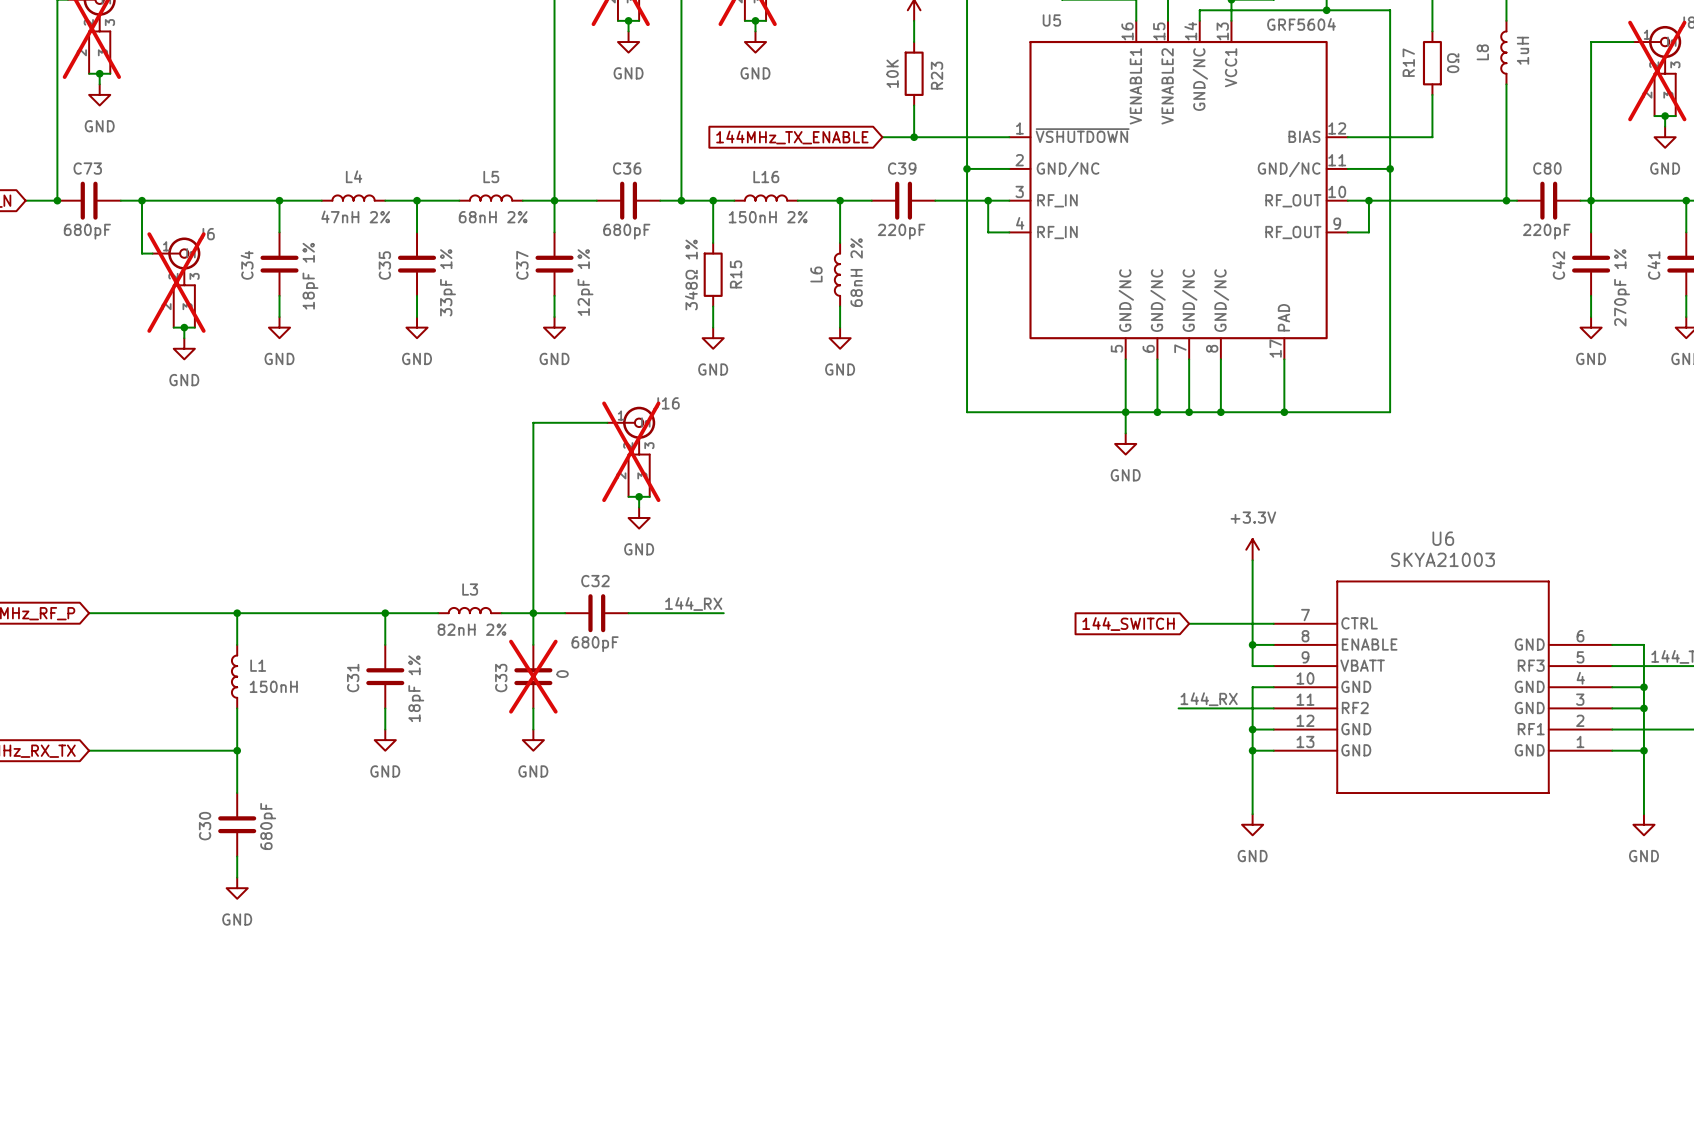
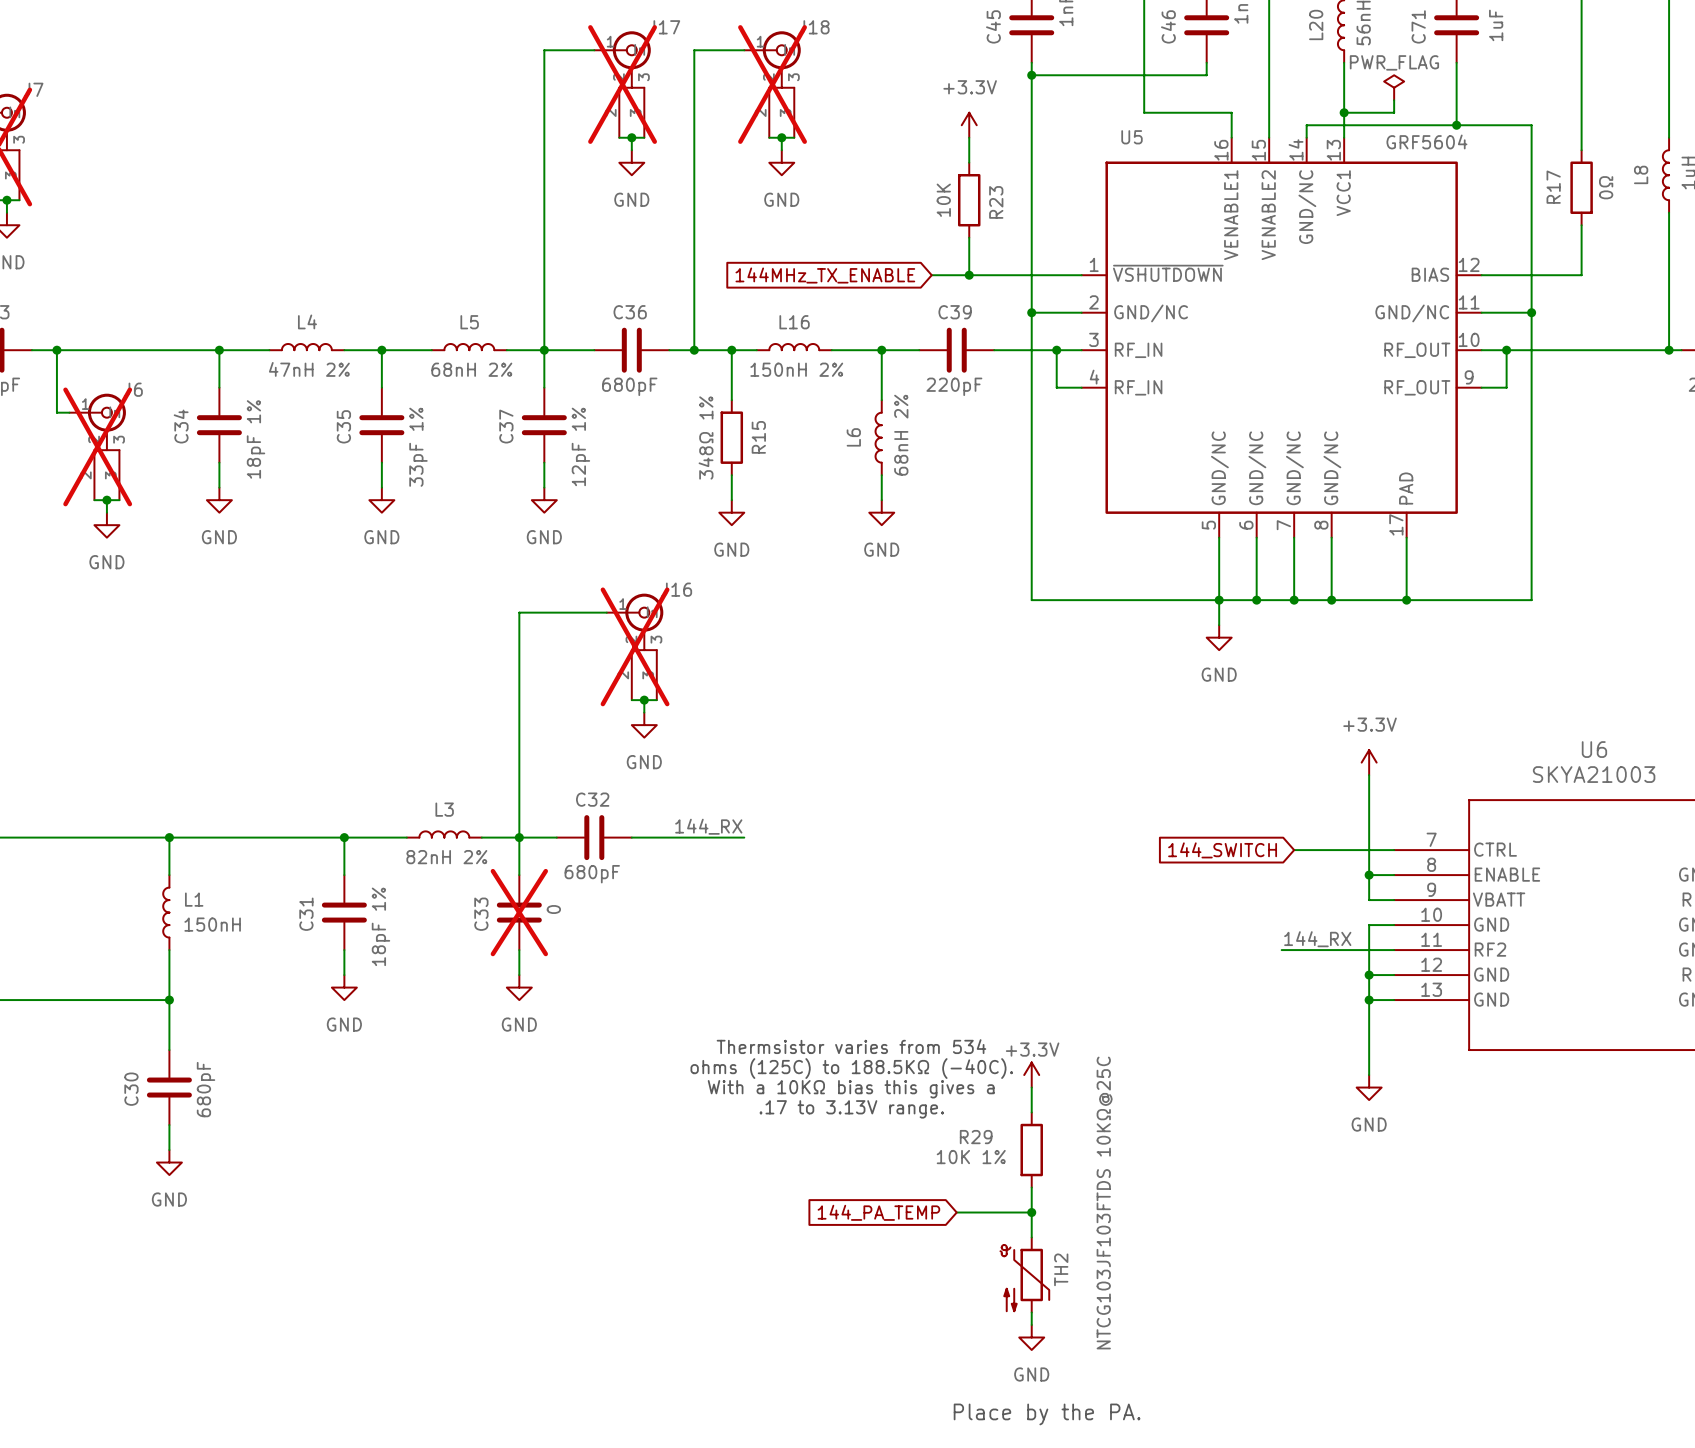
text: none -> Thermsistor varies from 534 (851, 1046)
text: none -> ohms (125C) to 188.5KΩ (-40C). (851, 1068)
power symbol: none -> +3.3V (1031, 1075)
wire: none -> (1031, 1087) (1031, 1112)
text: none -> With a 10KΩ bias this gives a (851, 1089)
text: none -> .17 to 3.13V range. (851, 1109)
R29: none -> 10K 1% (1031, 1150)
wire: none -> (1031, 1187) (1031, 1237)
global label: none -> 144_PA_TEMP (878, 1212)
wire: none -> (956, 1212) (1031, 1212)
junction: none -> (1031, 1212)
TH2: none -> NTCG103JF103FTDS 10KΩ@25C (1024, 1274)
wire: none -> (1031, 1312) (1031, 1324)
power symbol: none -> GND (1031, 1337)
text: none -> Place by the PA. (1047, 1414)

